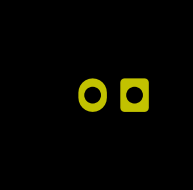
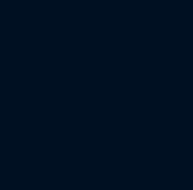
part: (113, 95) -> none

